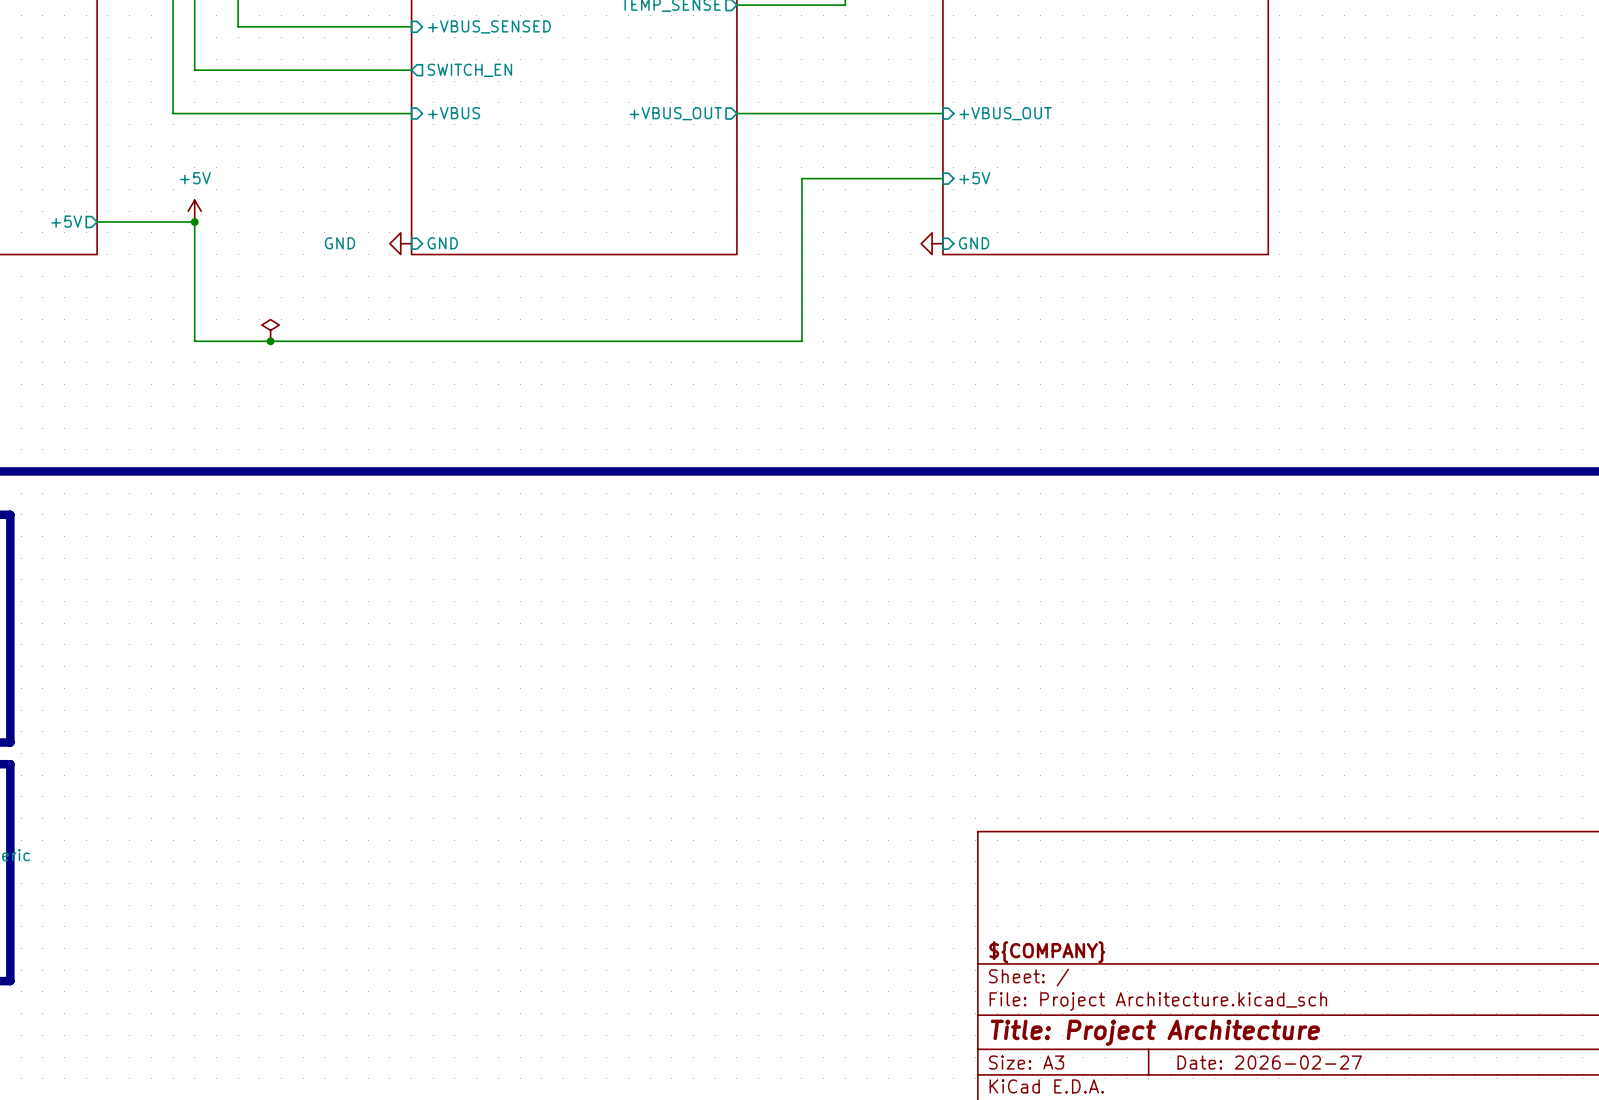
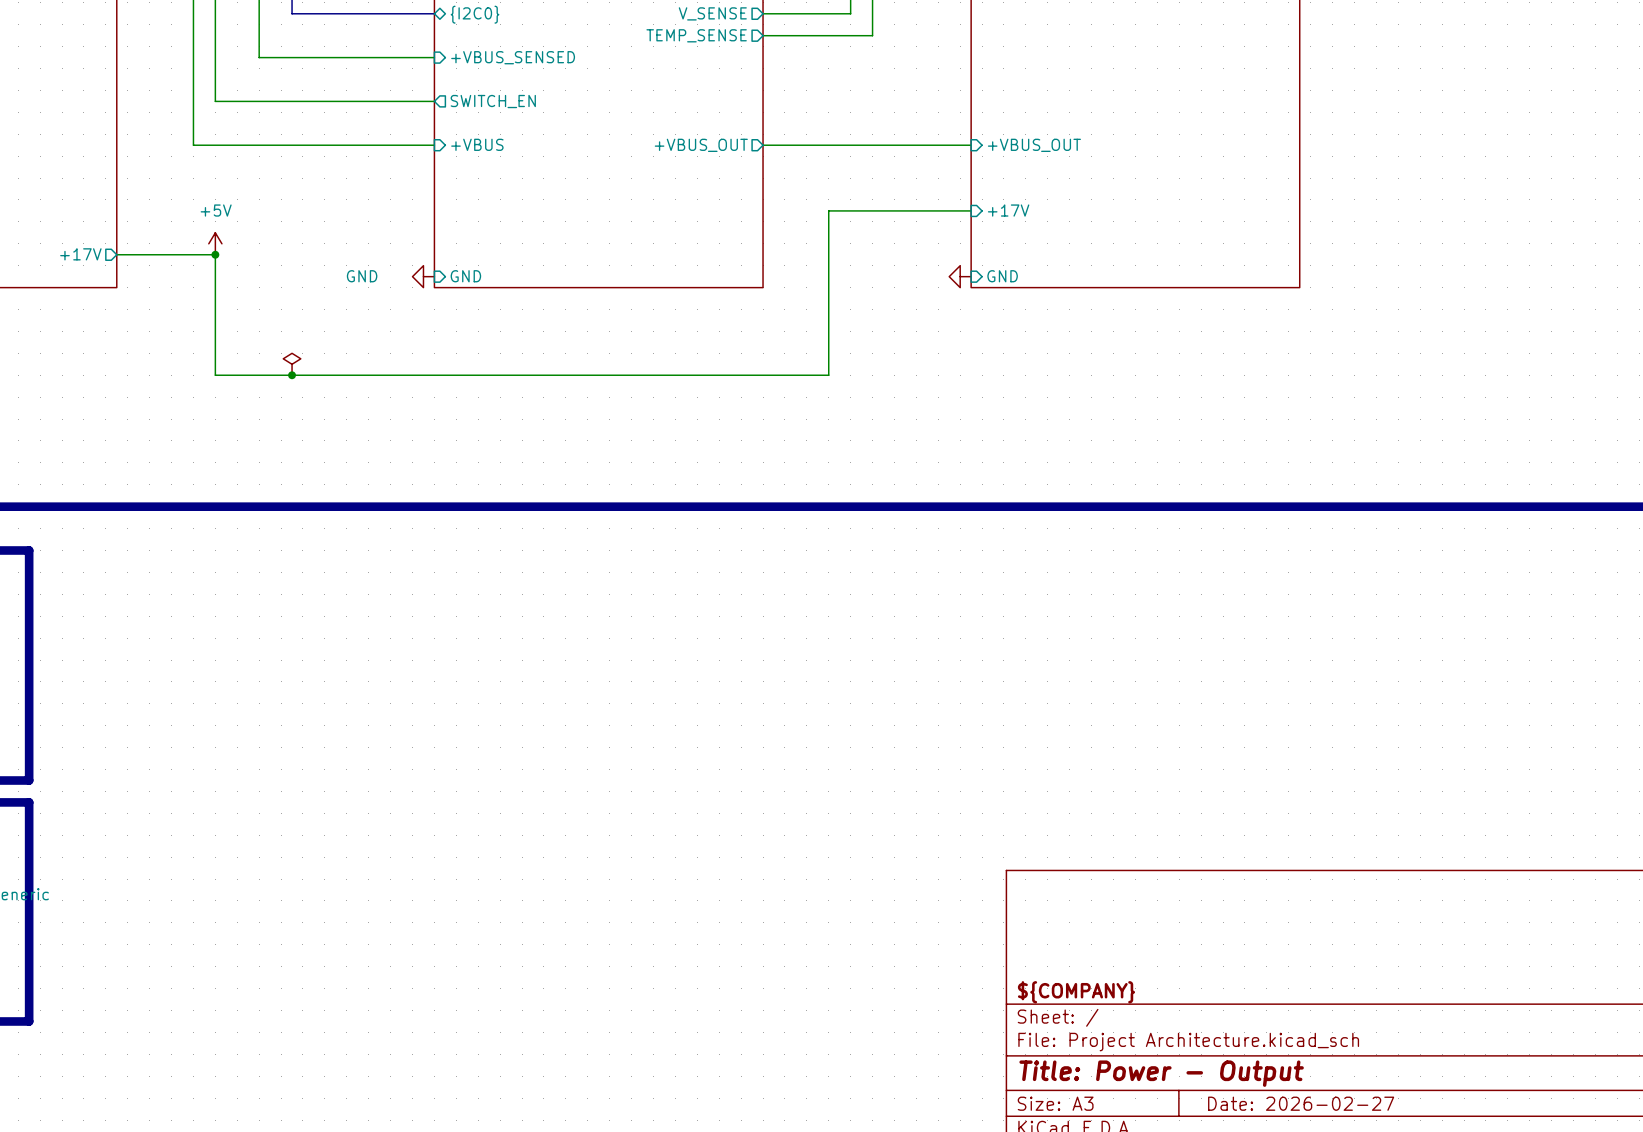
sheet pin: +5V (974, 178) -> +17V (1008, 210)
sheet pin: +5V (66, 221) -> +17V (80, 254)
title block: Title: Project Architecture (1155, 1032) -> Title: Power - Output (1161, 1073)

